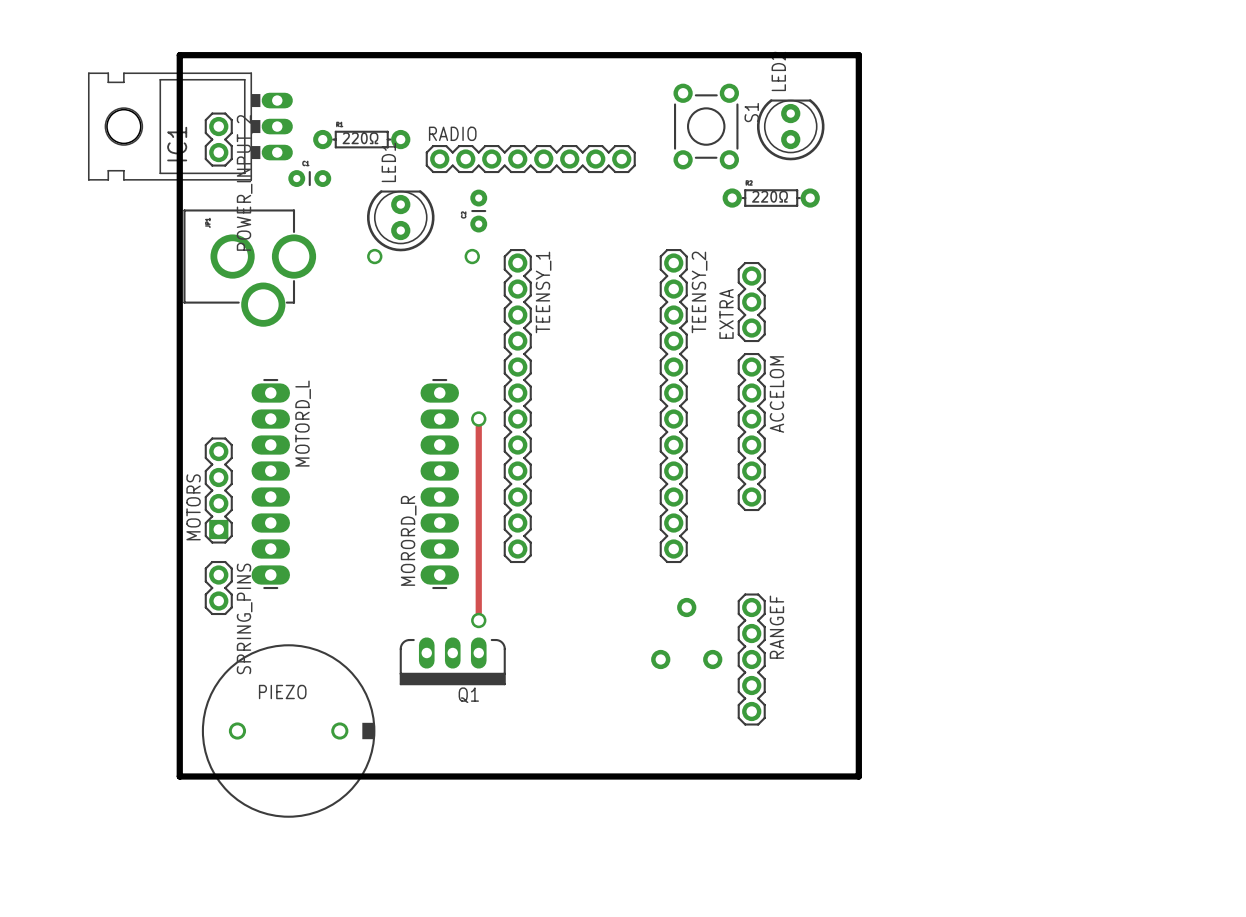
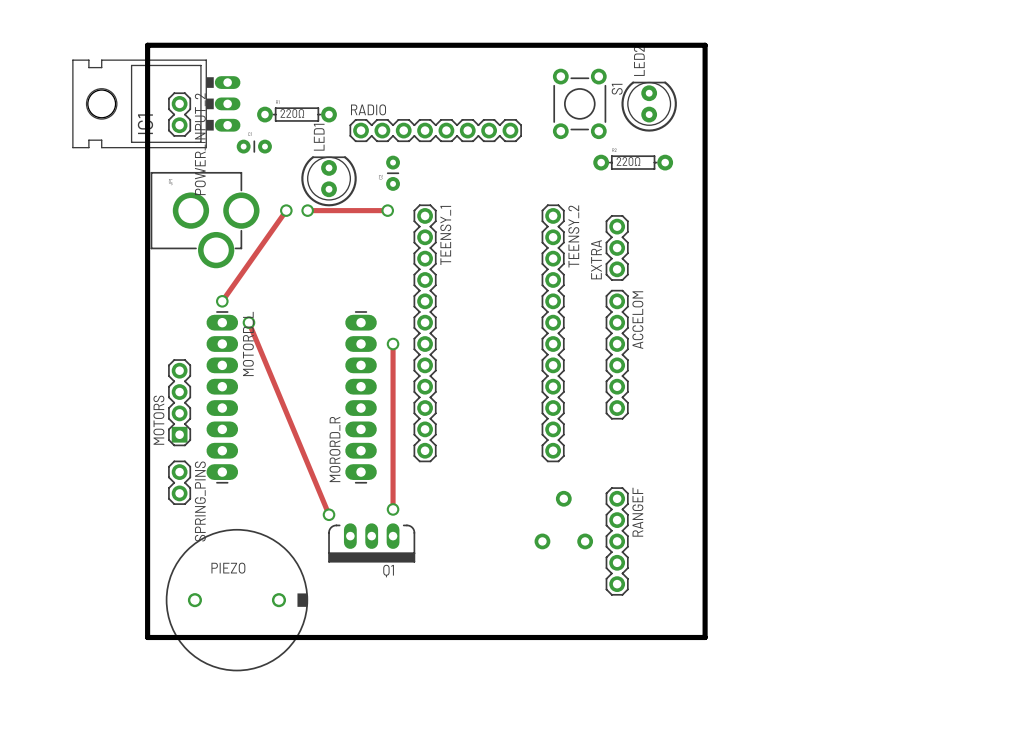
track: none -> (286, 210) (222, 301)
via: none -> (286, 210)
track: none -> (307, 210) (387, 210)
via: none -> (222, 301)
track: none -> (248, 322) (329, 514)
via: none -> (248, 322)
via: none -> (329, 514)

